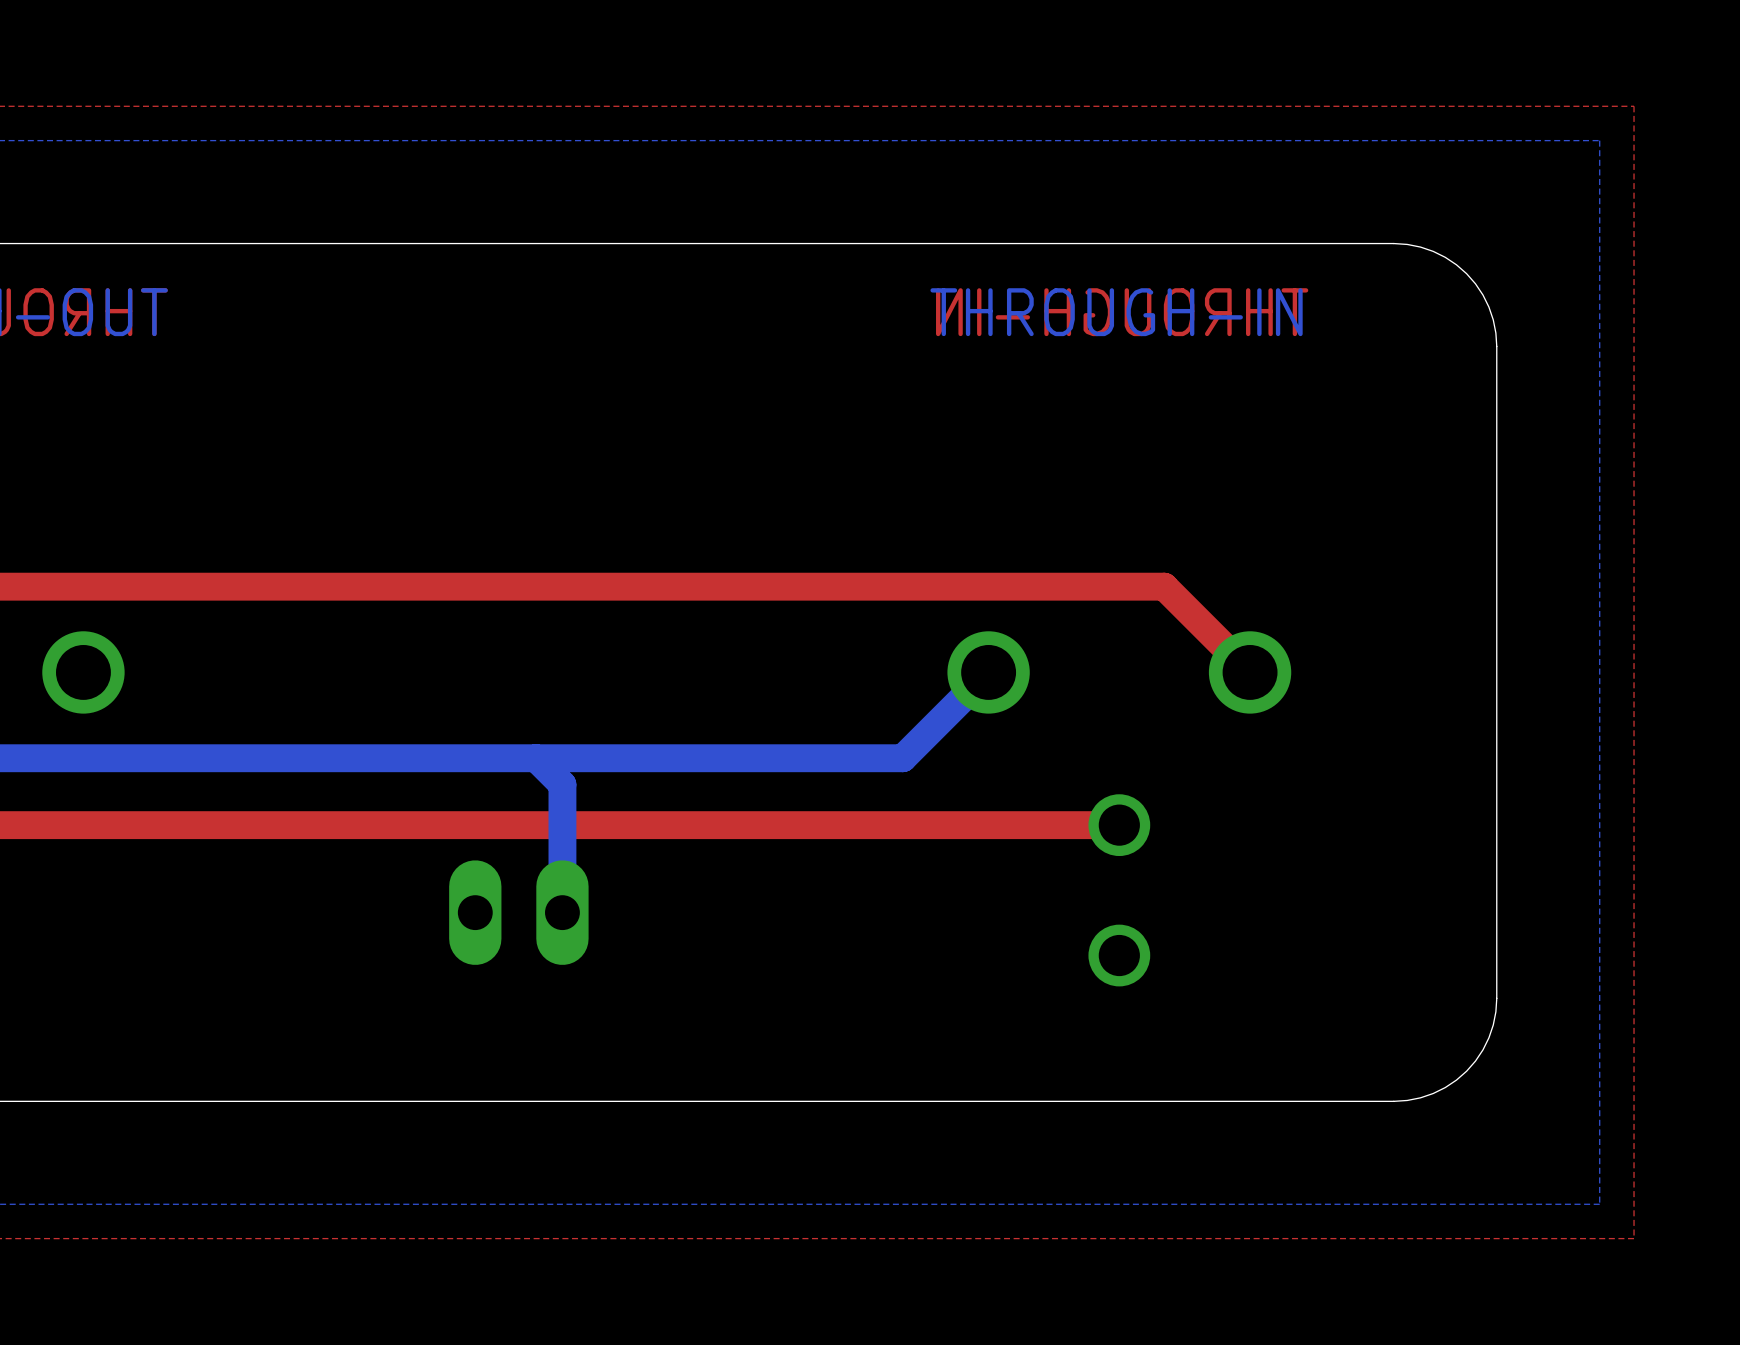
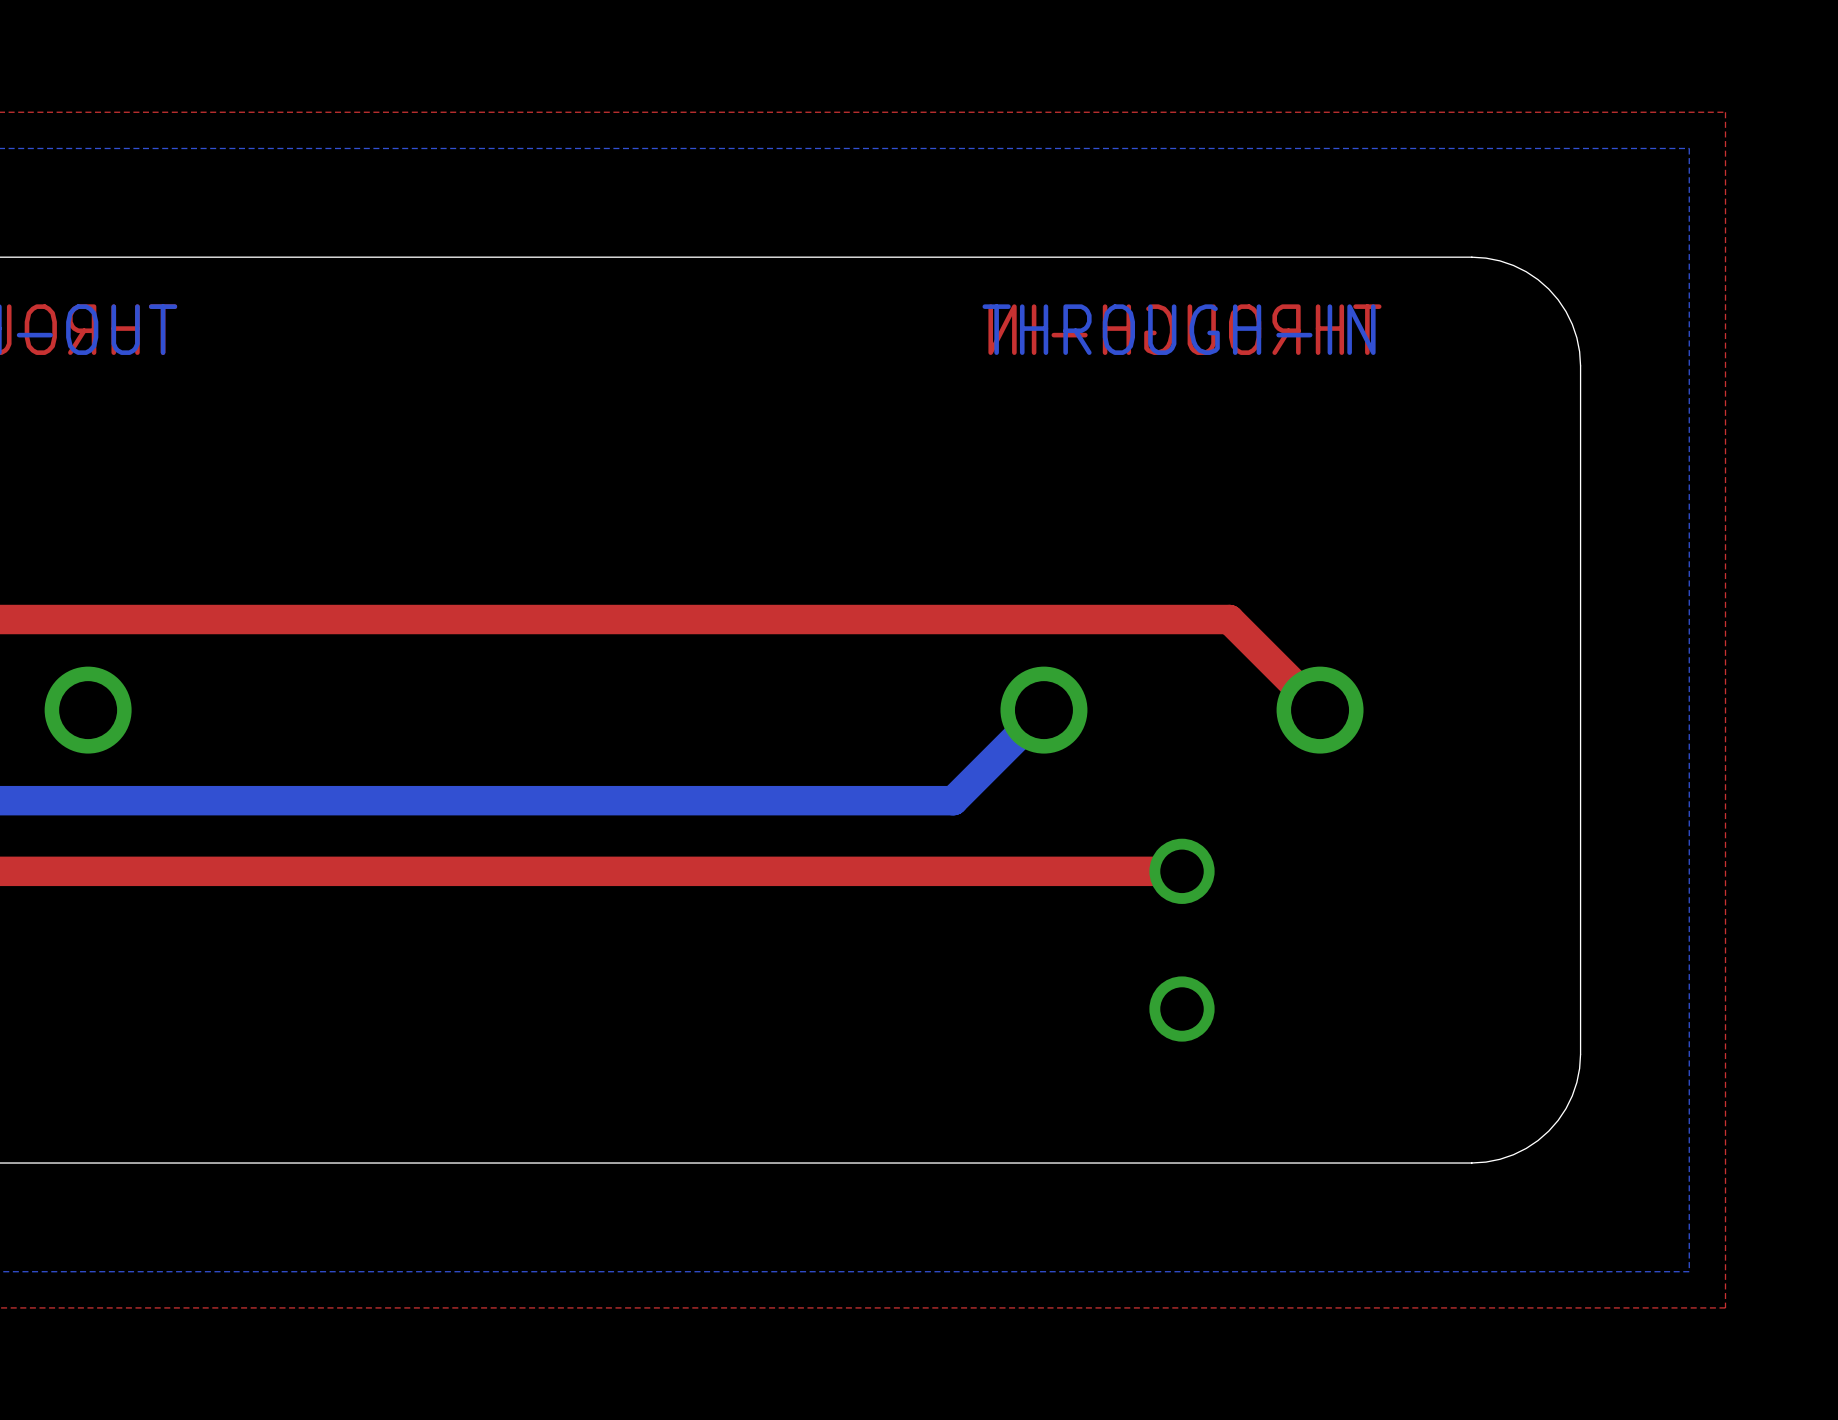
bottom track: (536, 758) (562, 784) (562, 912) -> none
part: (518, 912) -> none

